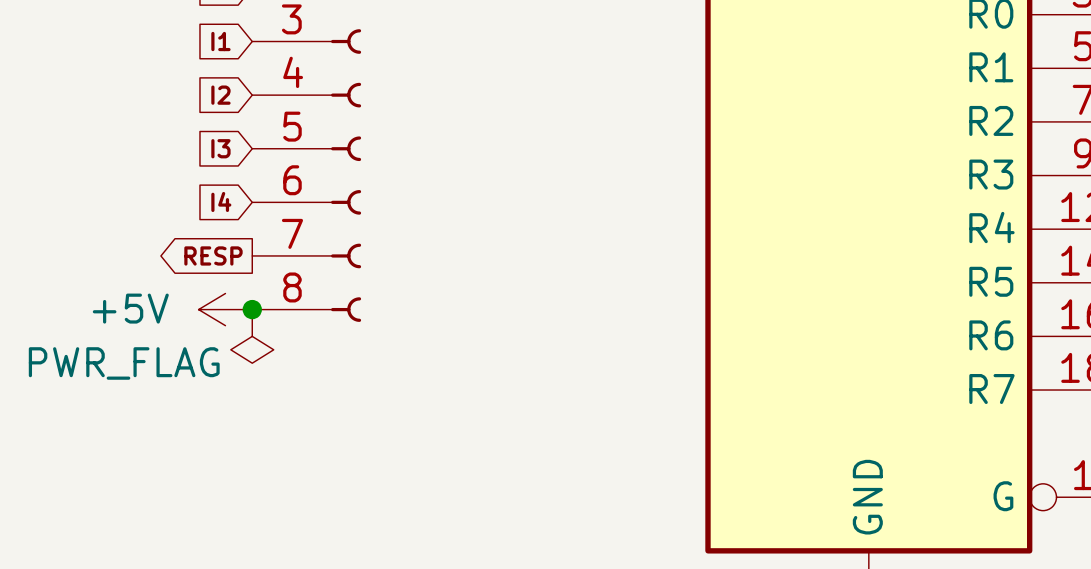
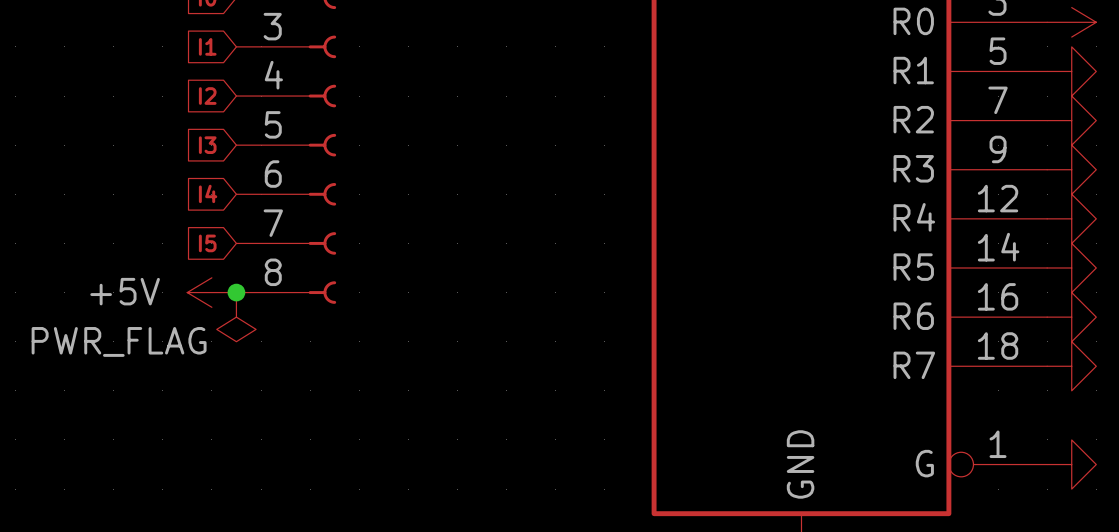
global label shape: output (213, 255) -> input (207, 243)
global label: RESP (213, 255) -> I5 (207, 243)

